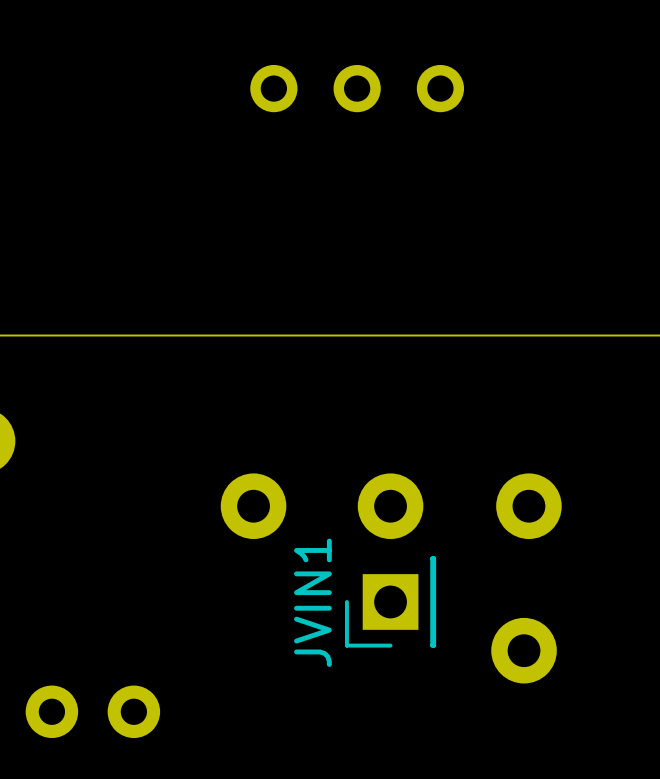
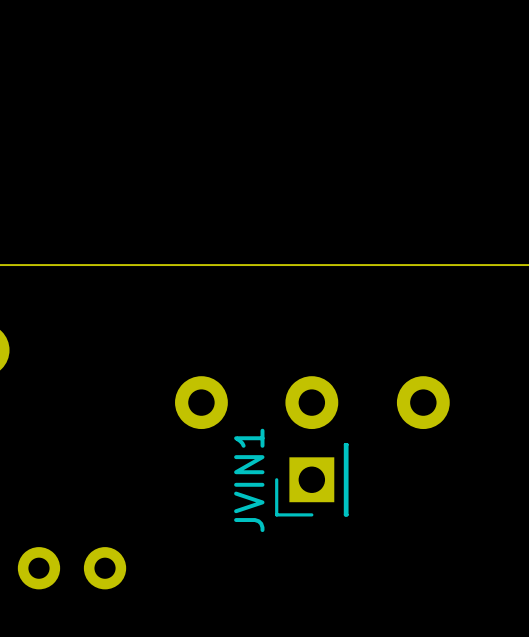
part: (357, 88) -> none
part: (524, 650) -> none

